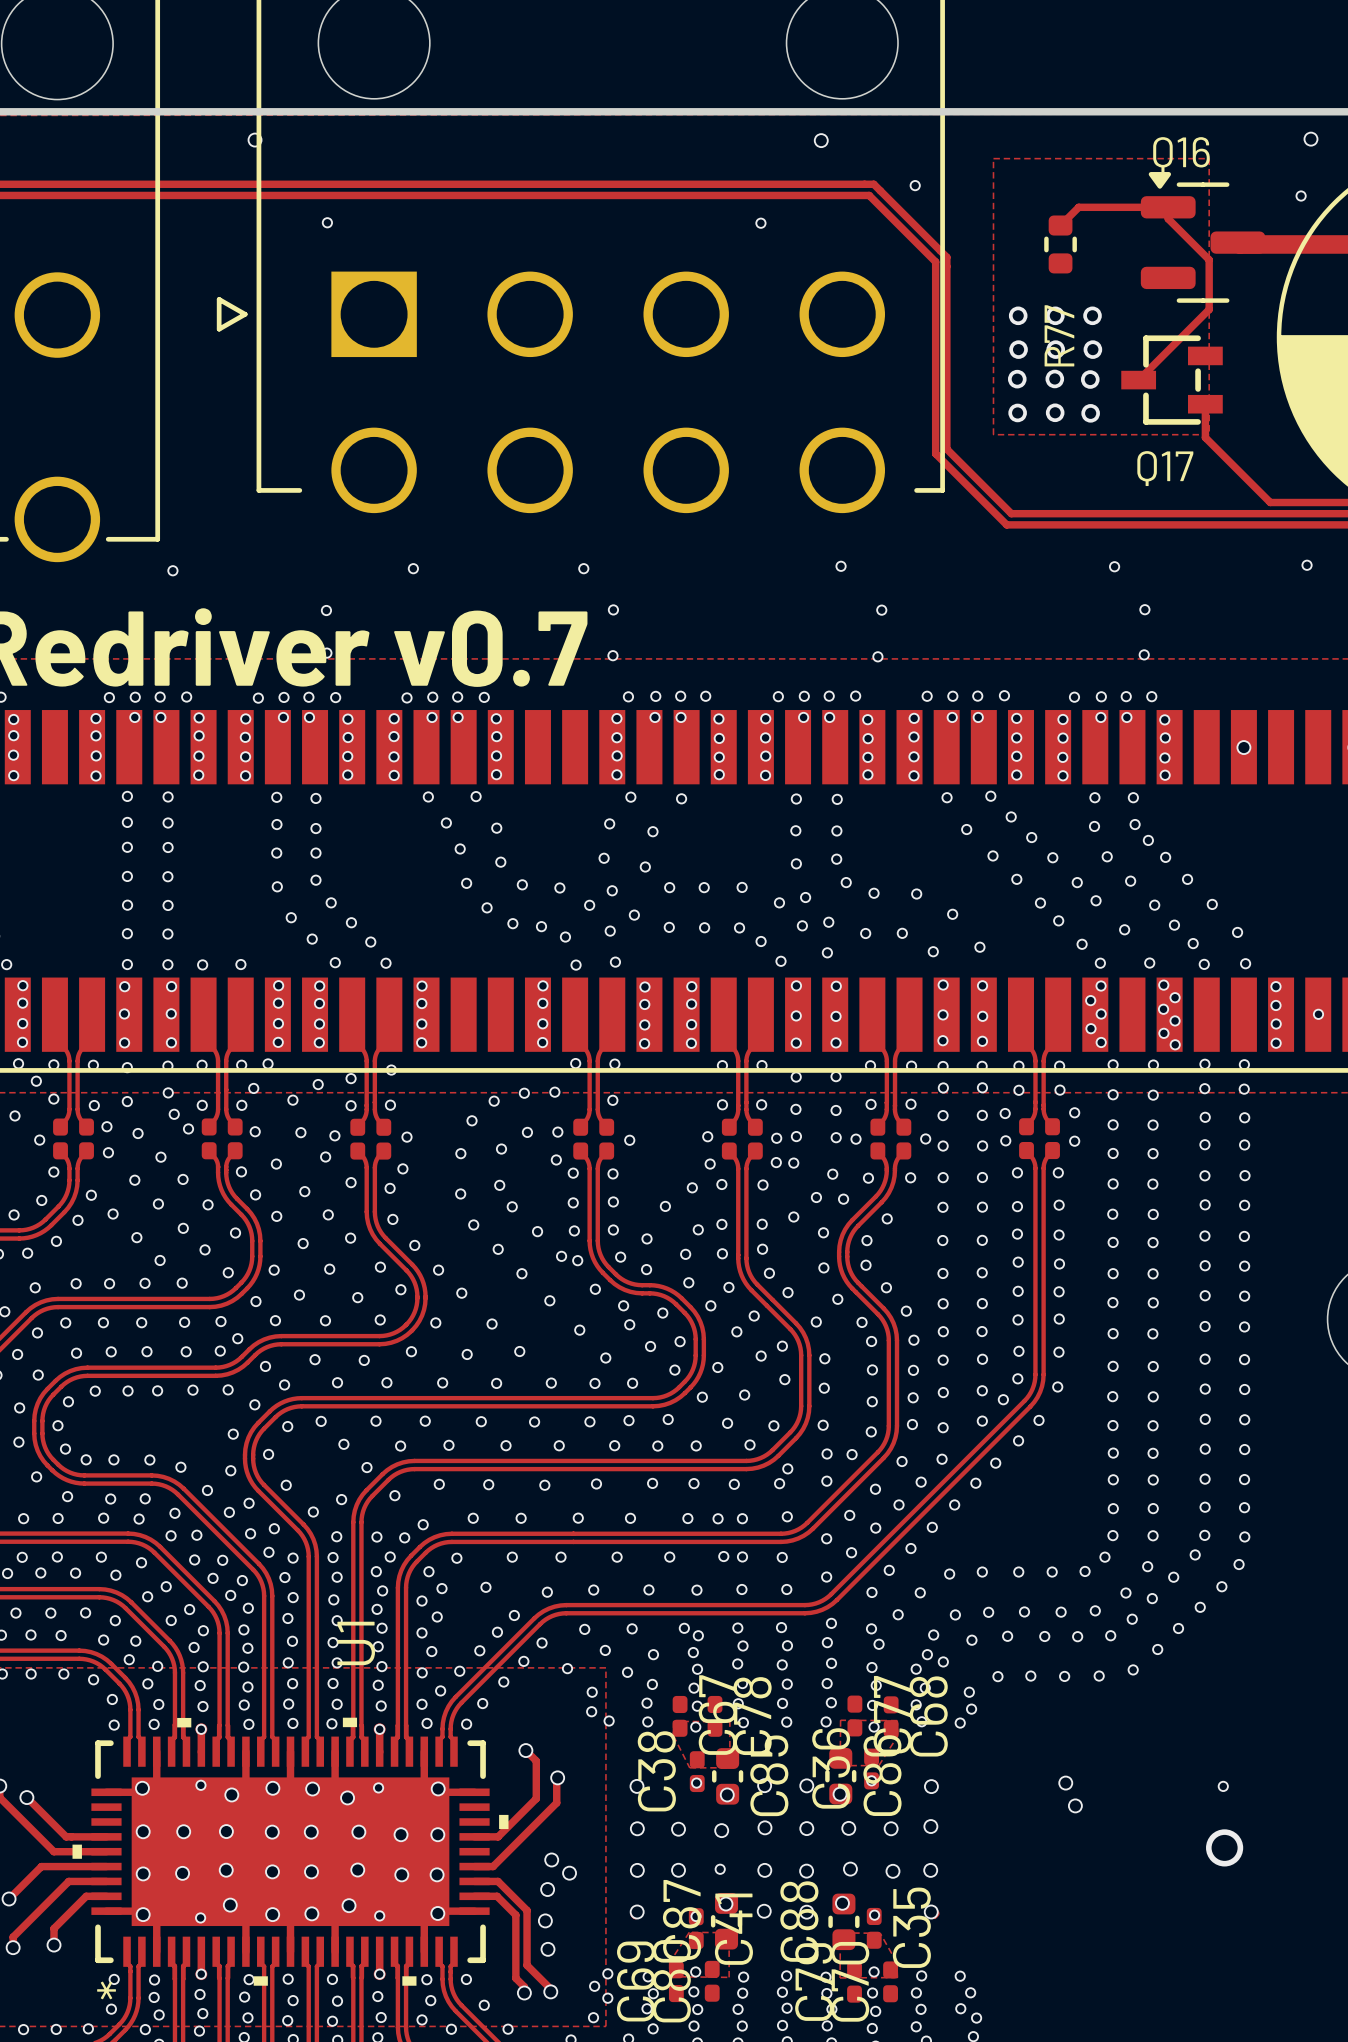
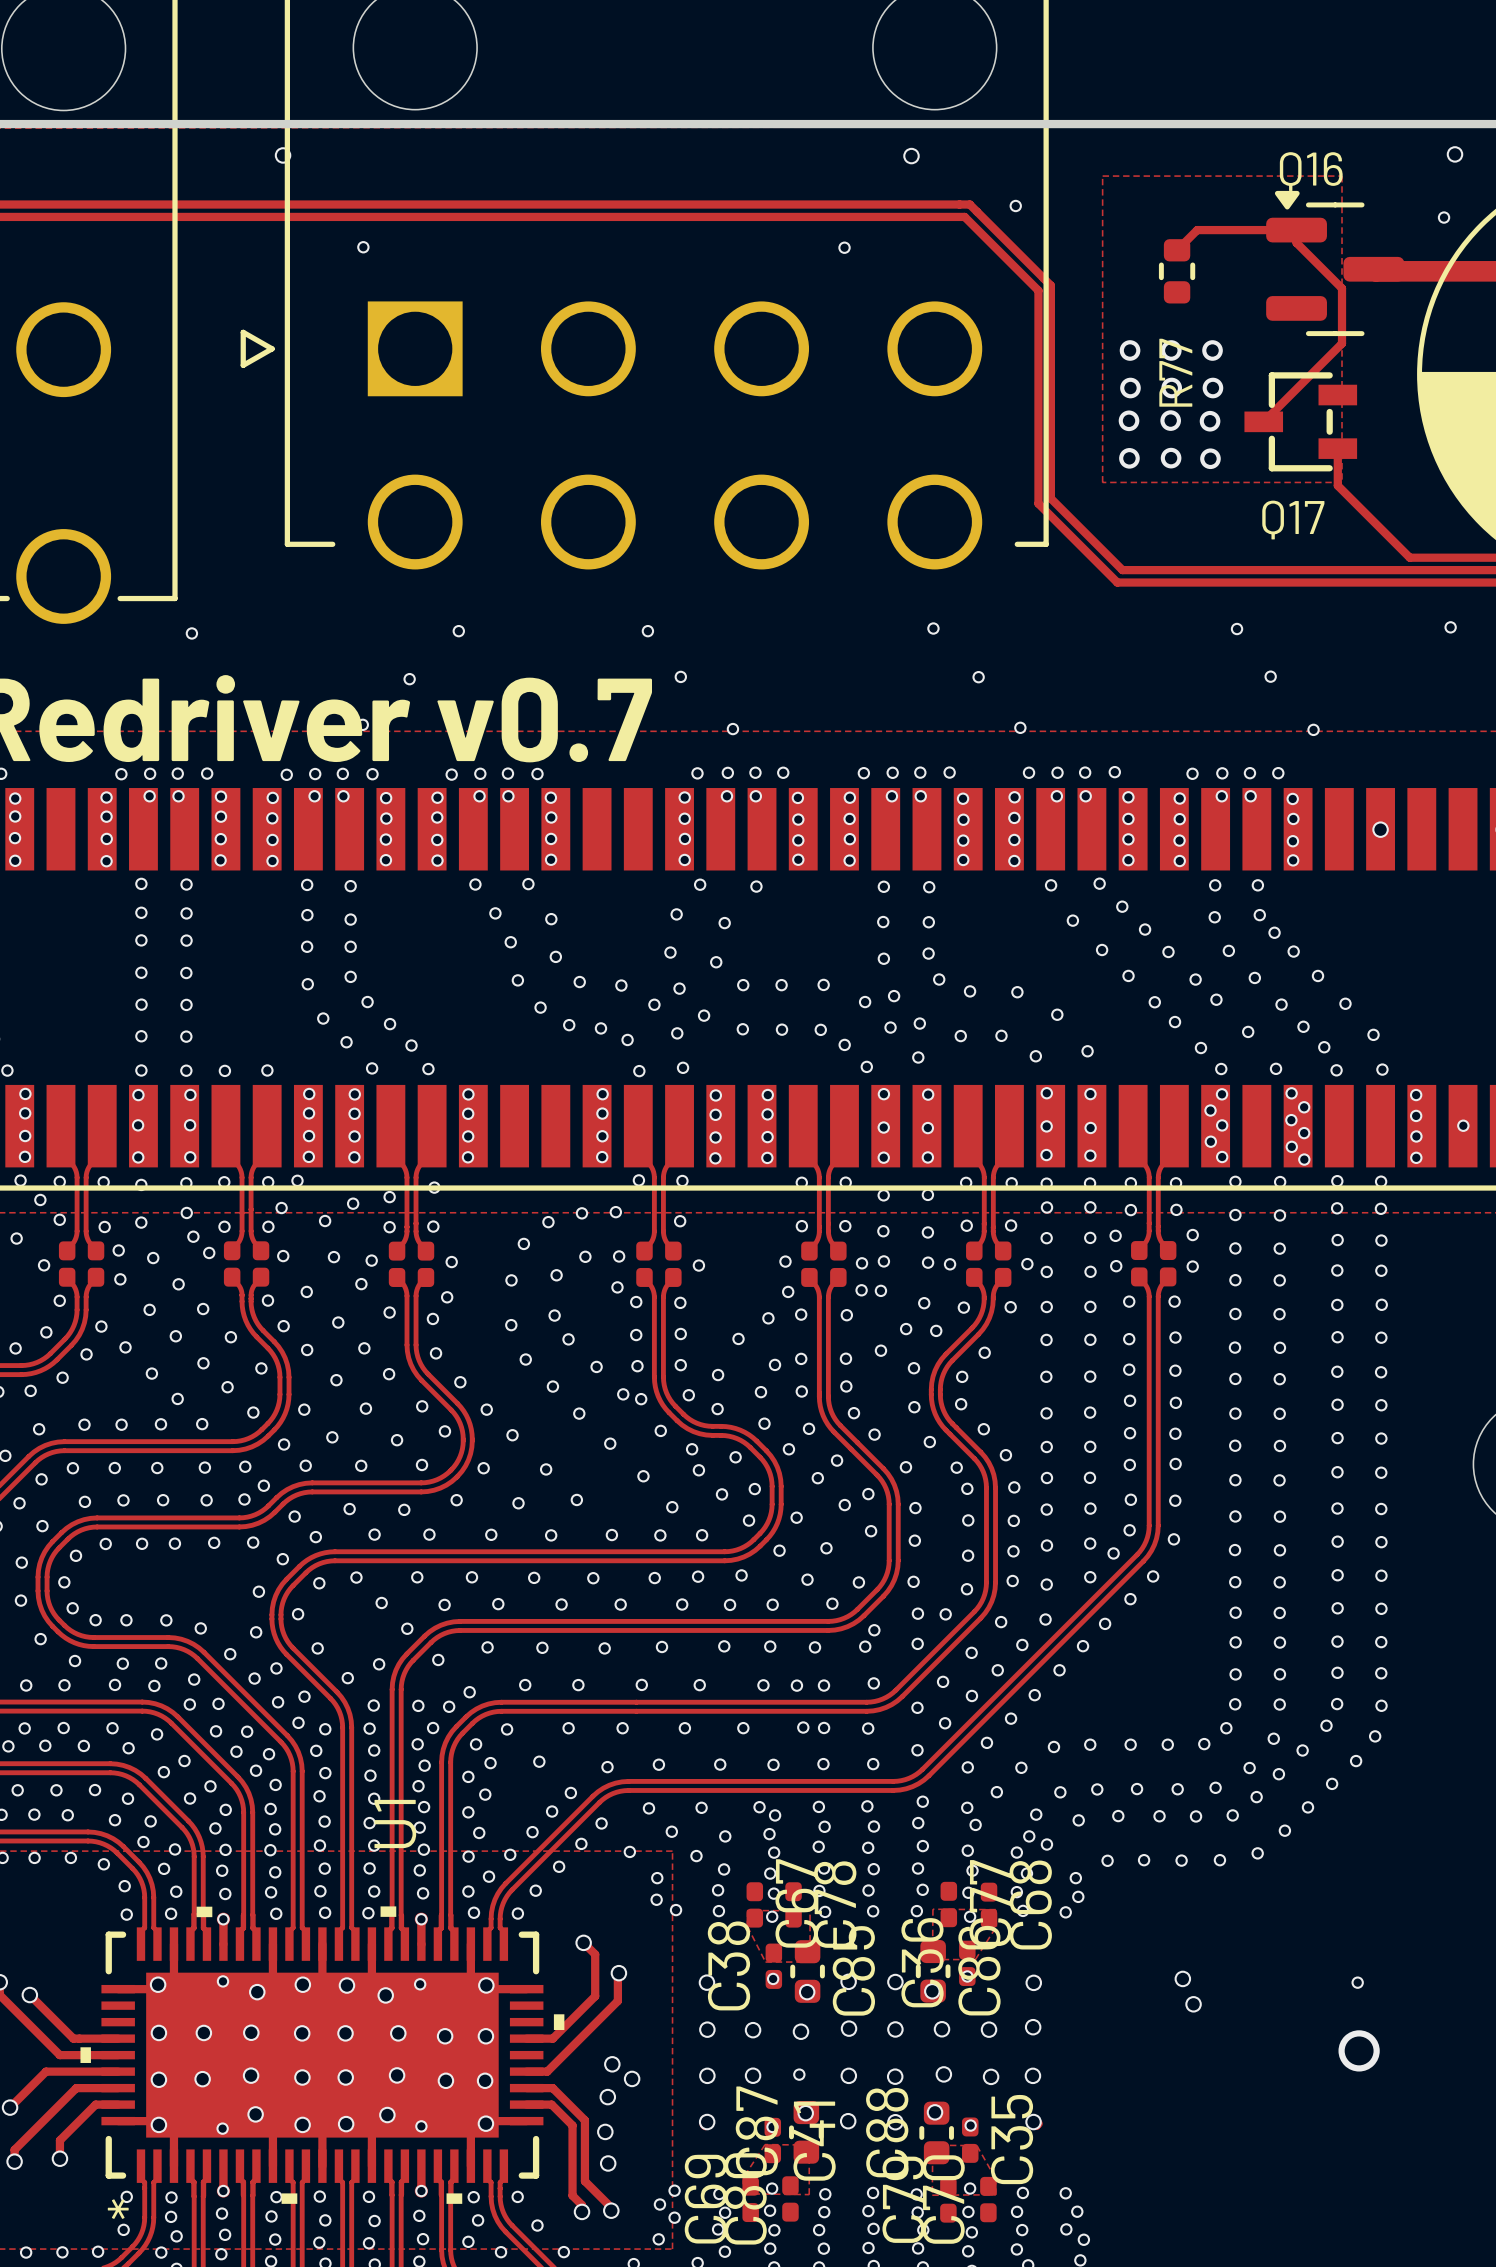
via position: (326, 610) -> (409, 679)
via position: (1144, 654) -> (1313, 729)
via position: (612, 655) -> (732, 729)
via position: (877, 656) -> (1020, 727)

